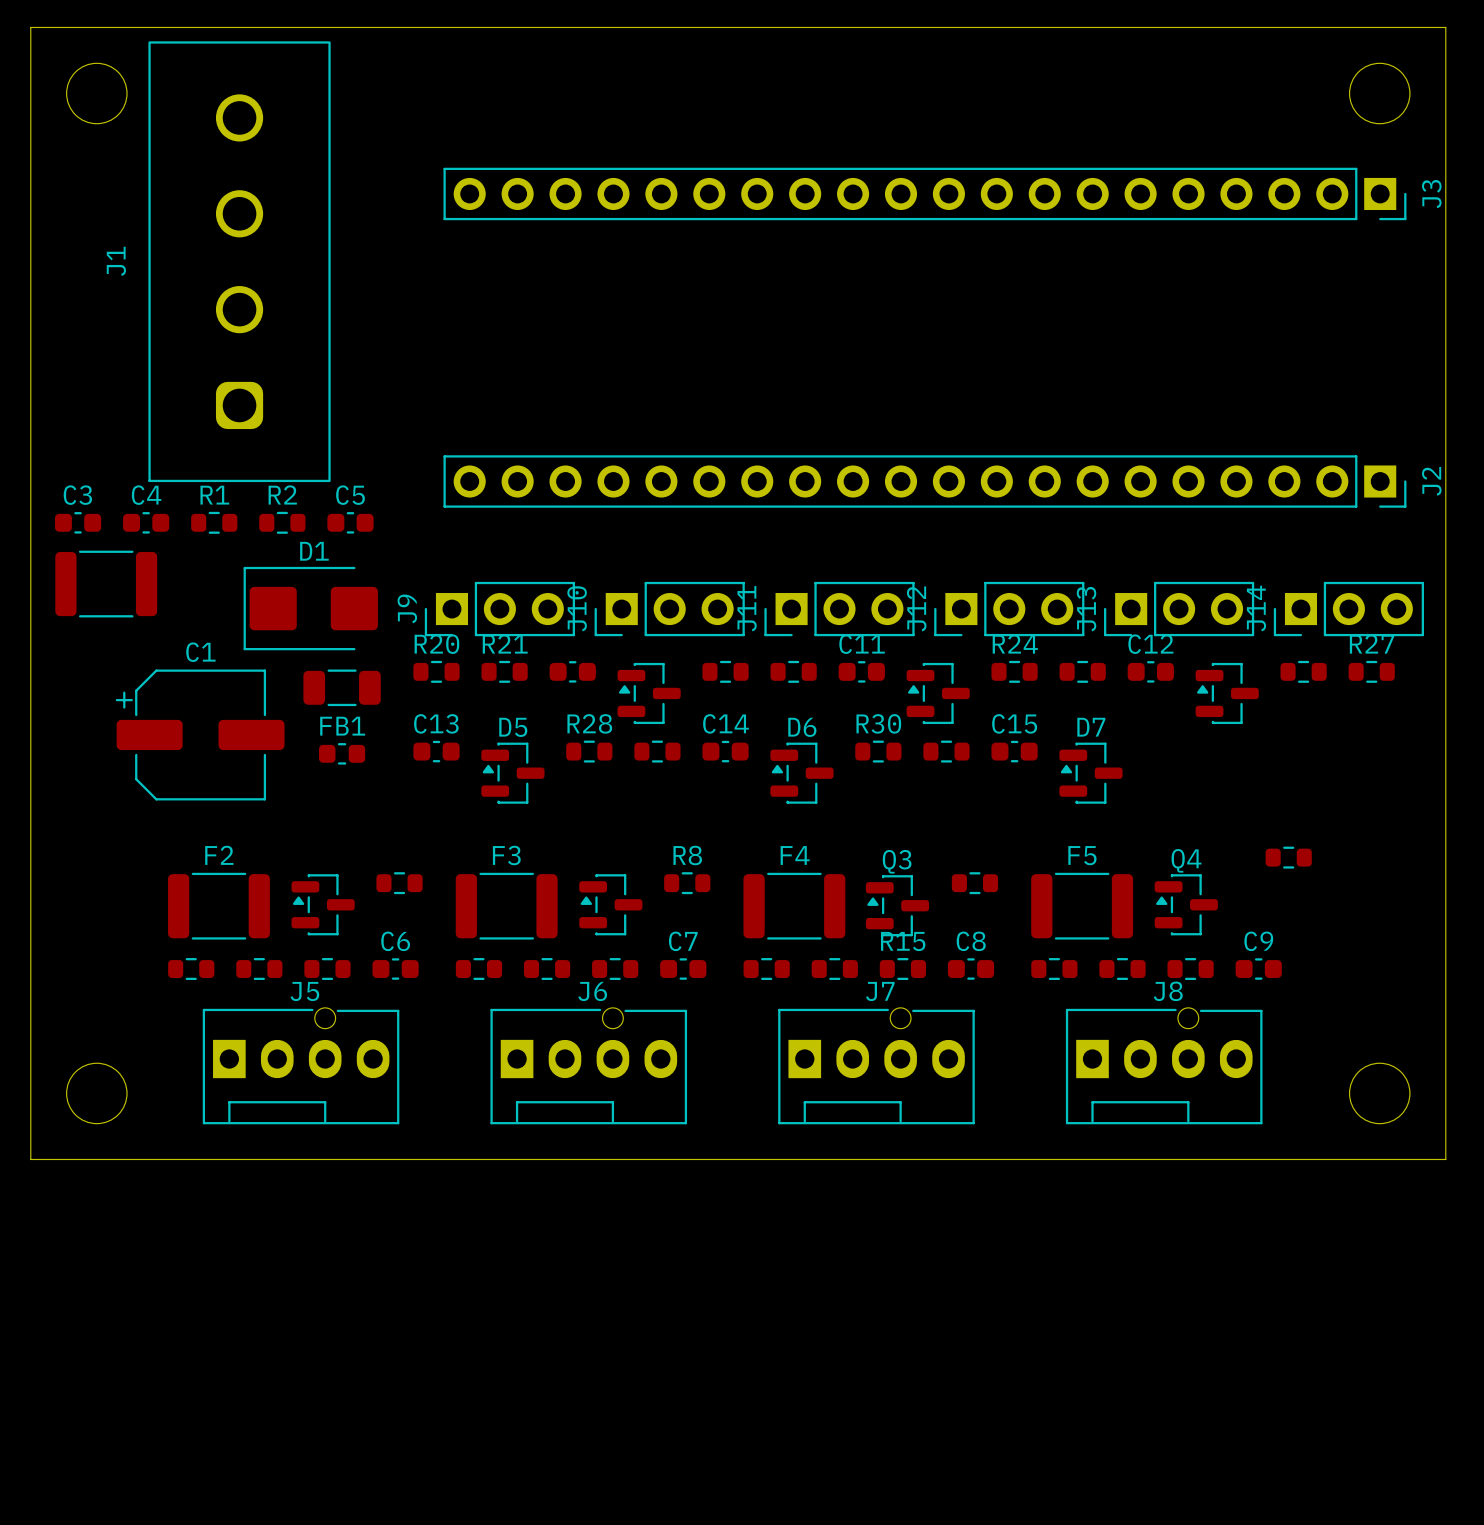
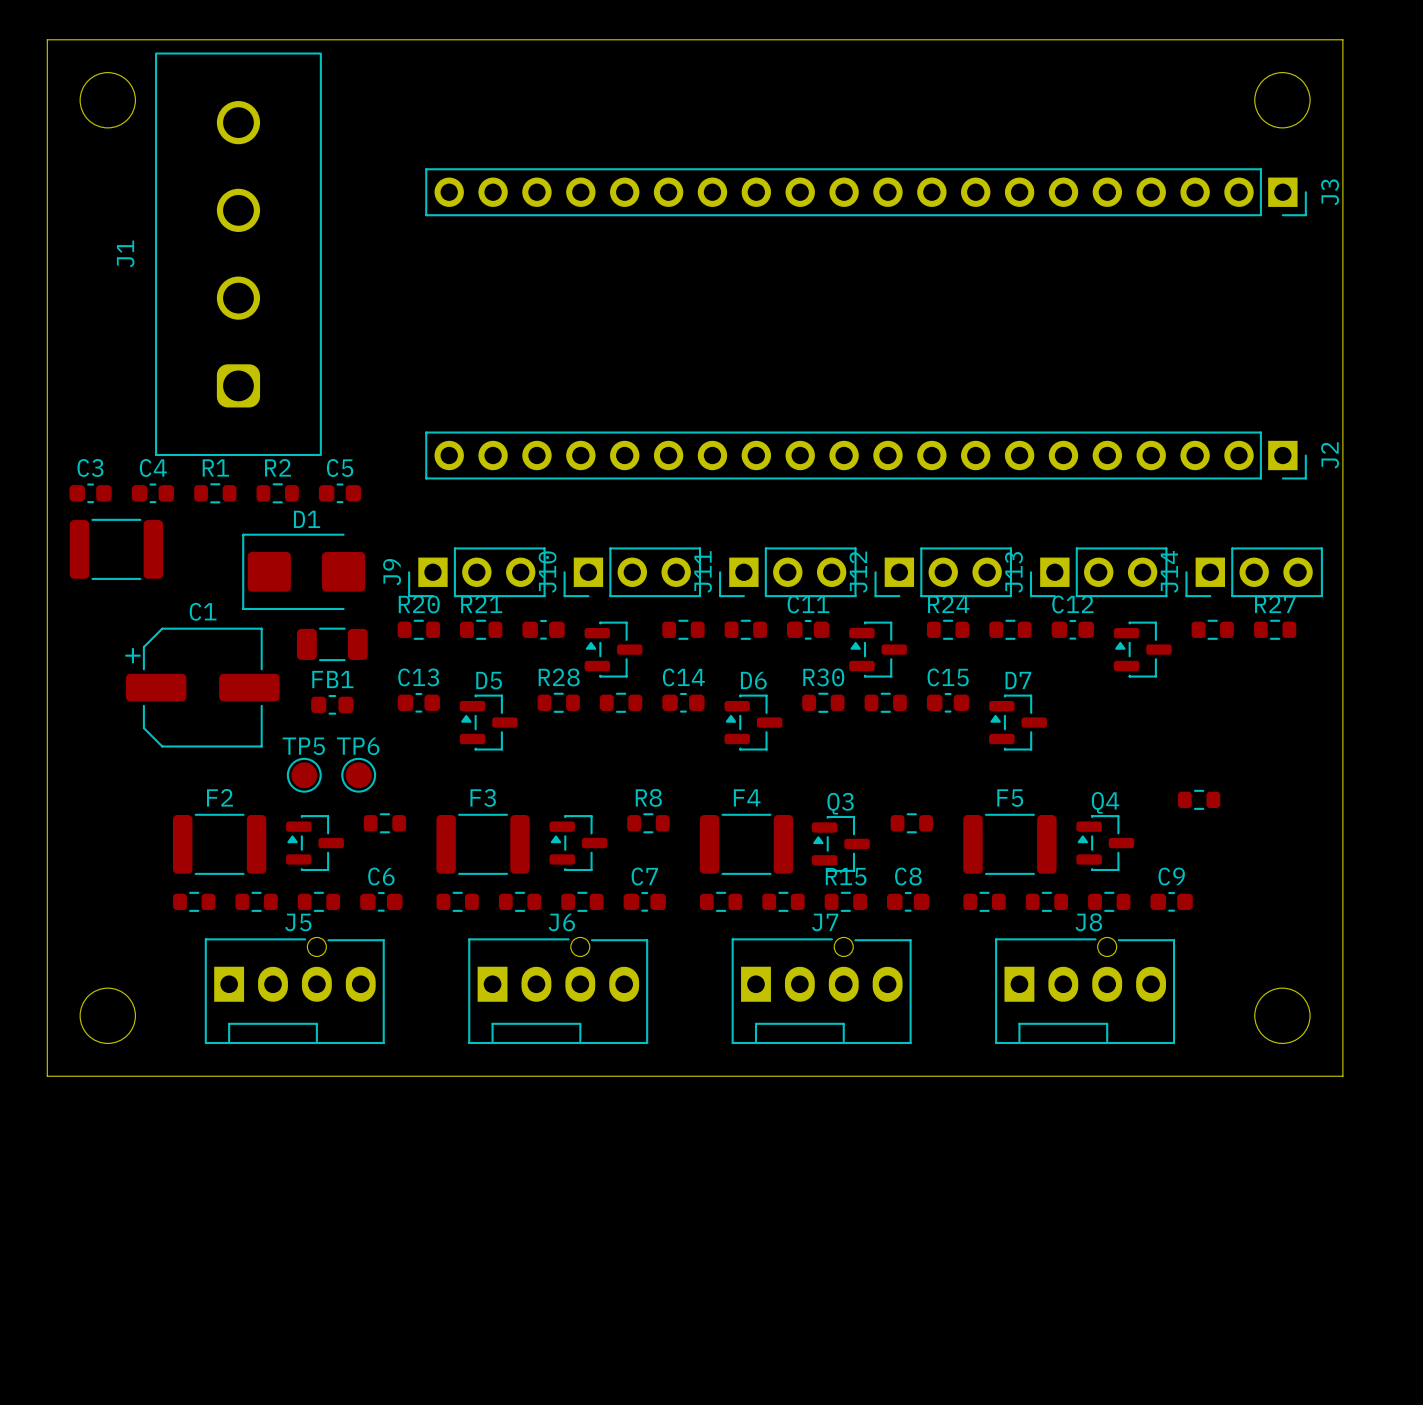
TP5: none -> (304, 775)
TP6: none -> (358, 775)

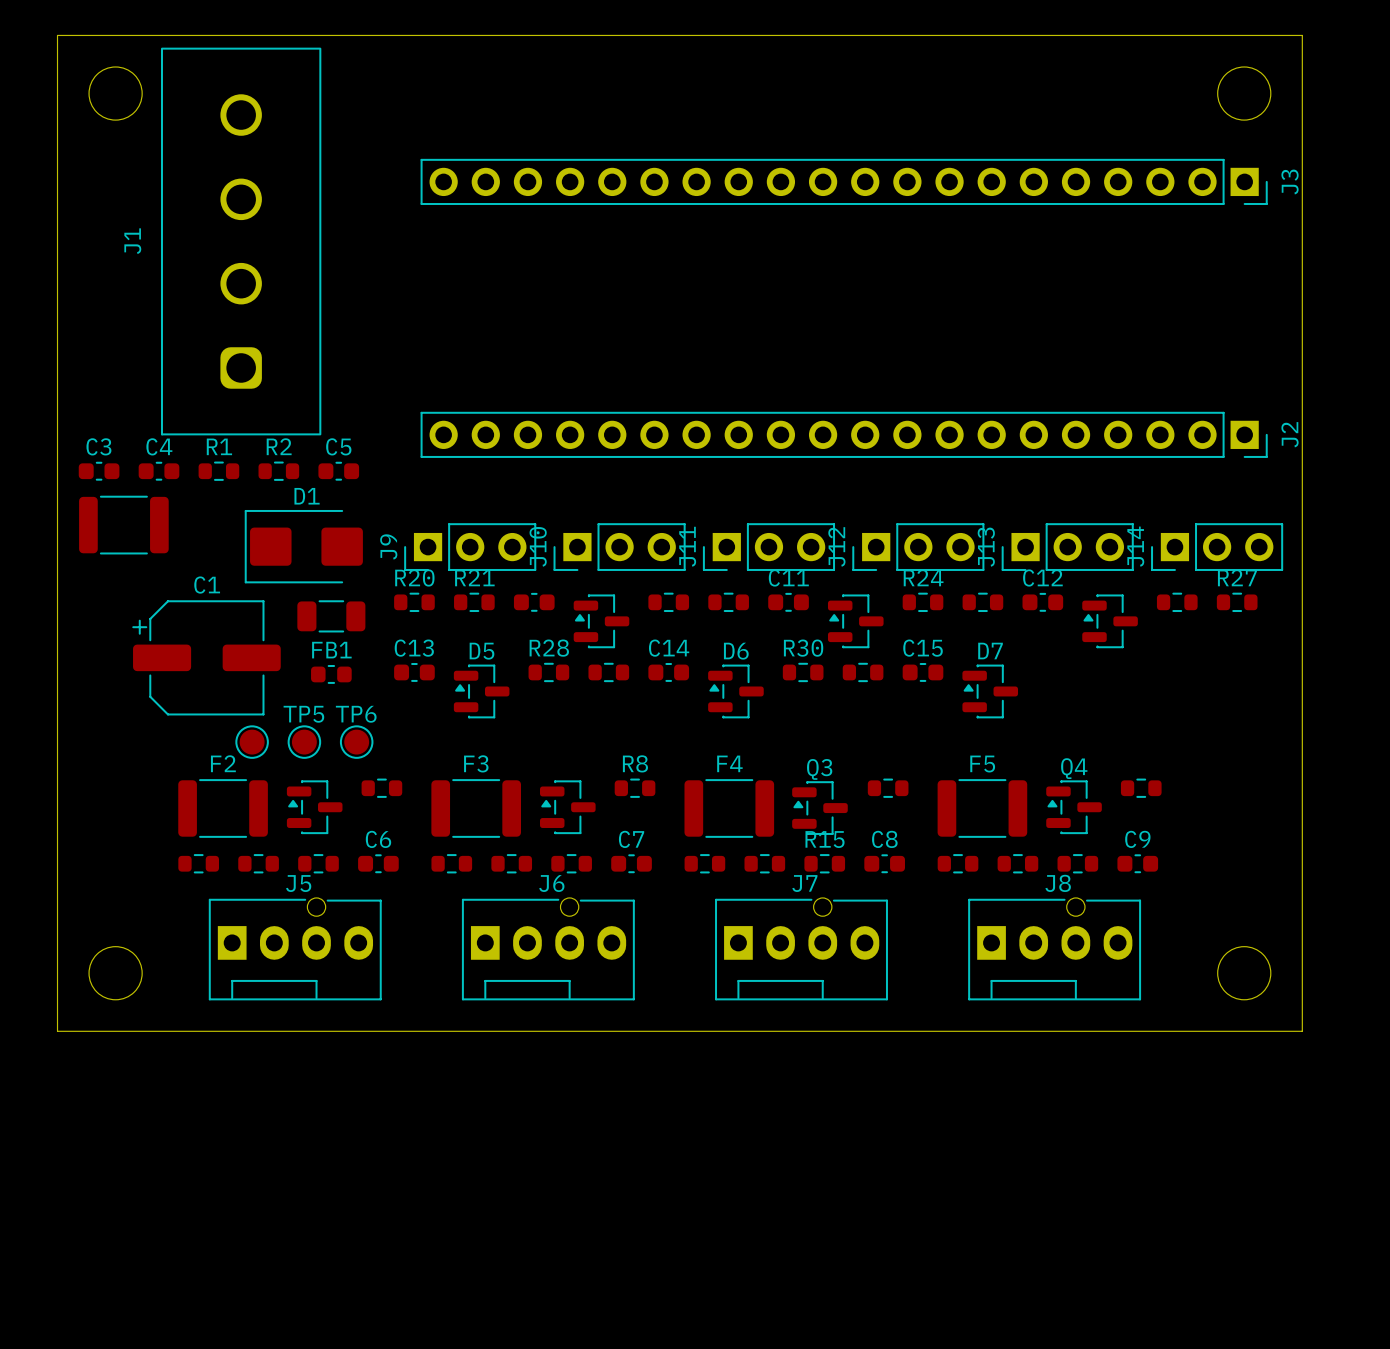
part: none -> (252, 742)
part position: (1199, 799) -> (1141, 788)

